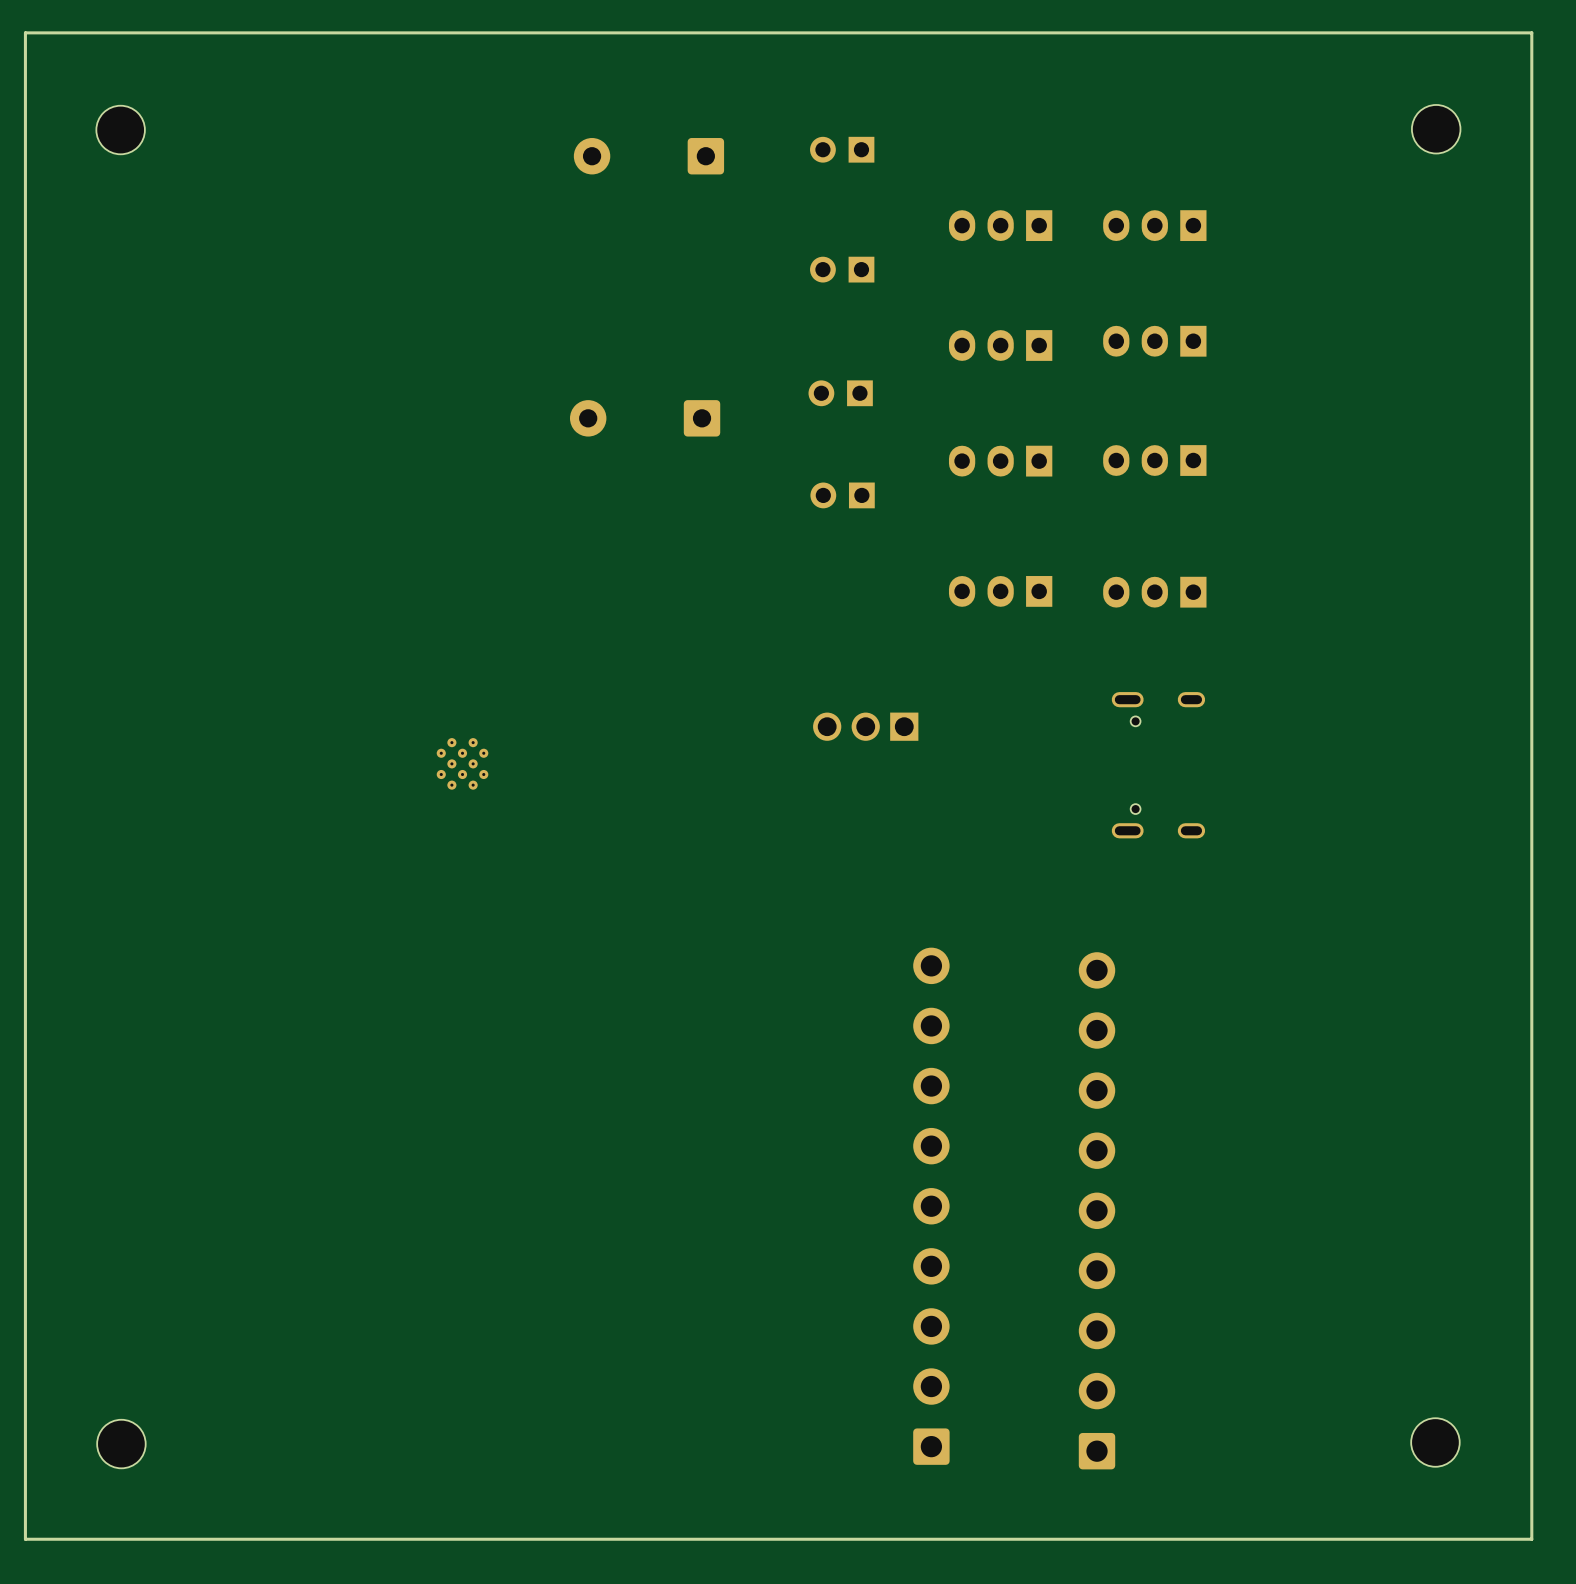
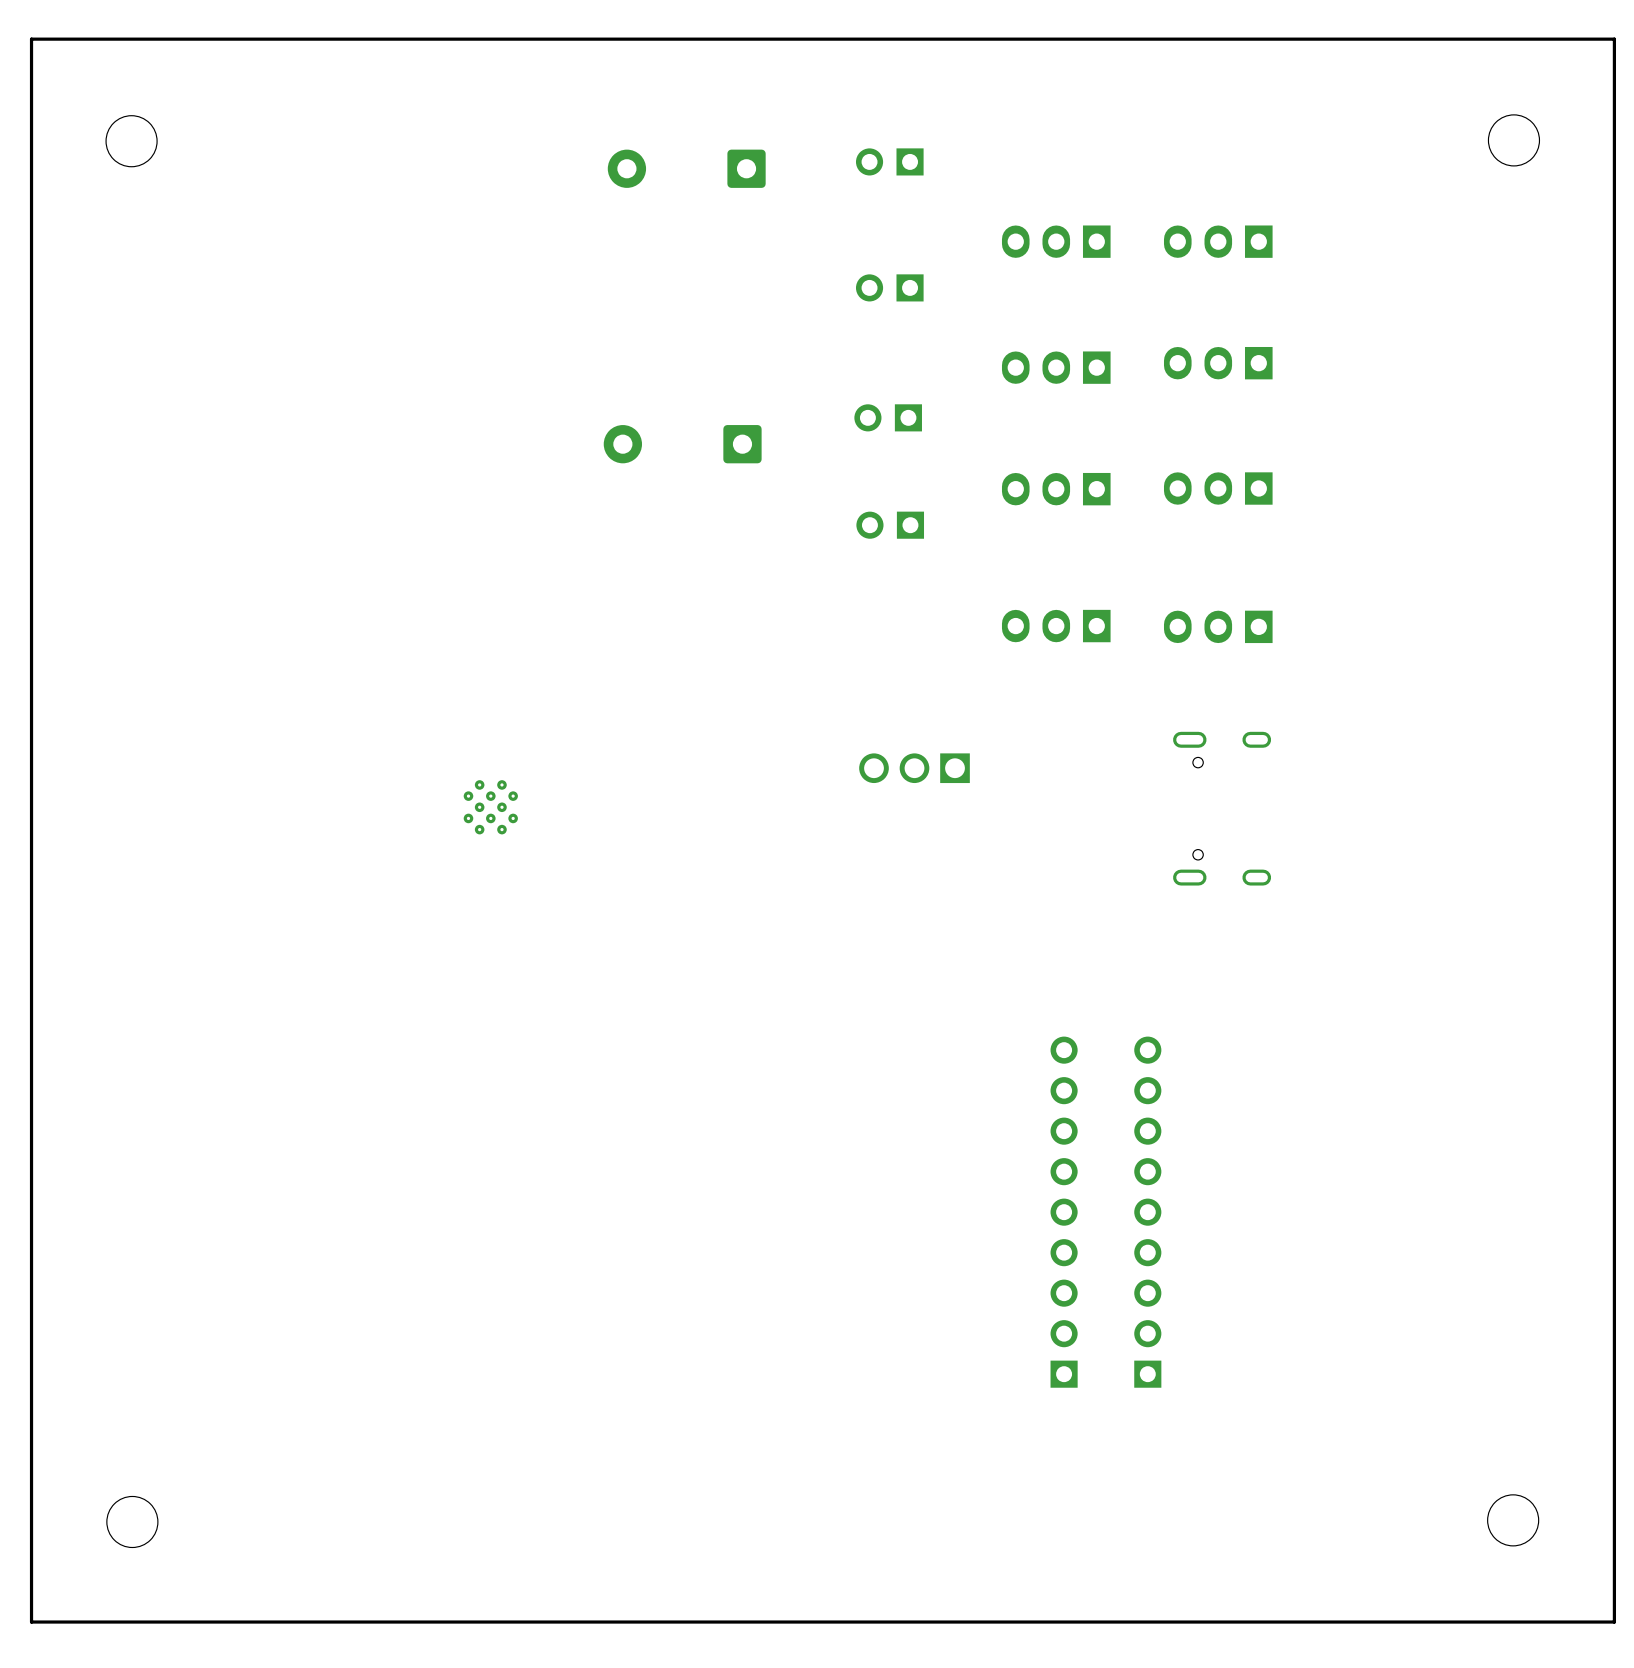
part: none -> (1064, 1212)
part: none -> (1147, 1212)
part: (931, 1206) -> none
part: (1097, 1210) -> none

